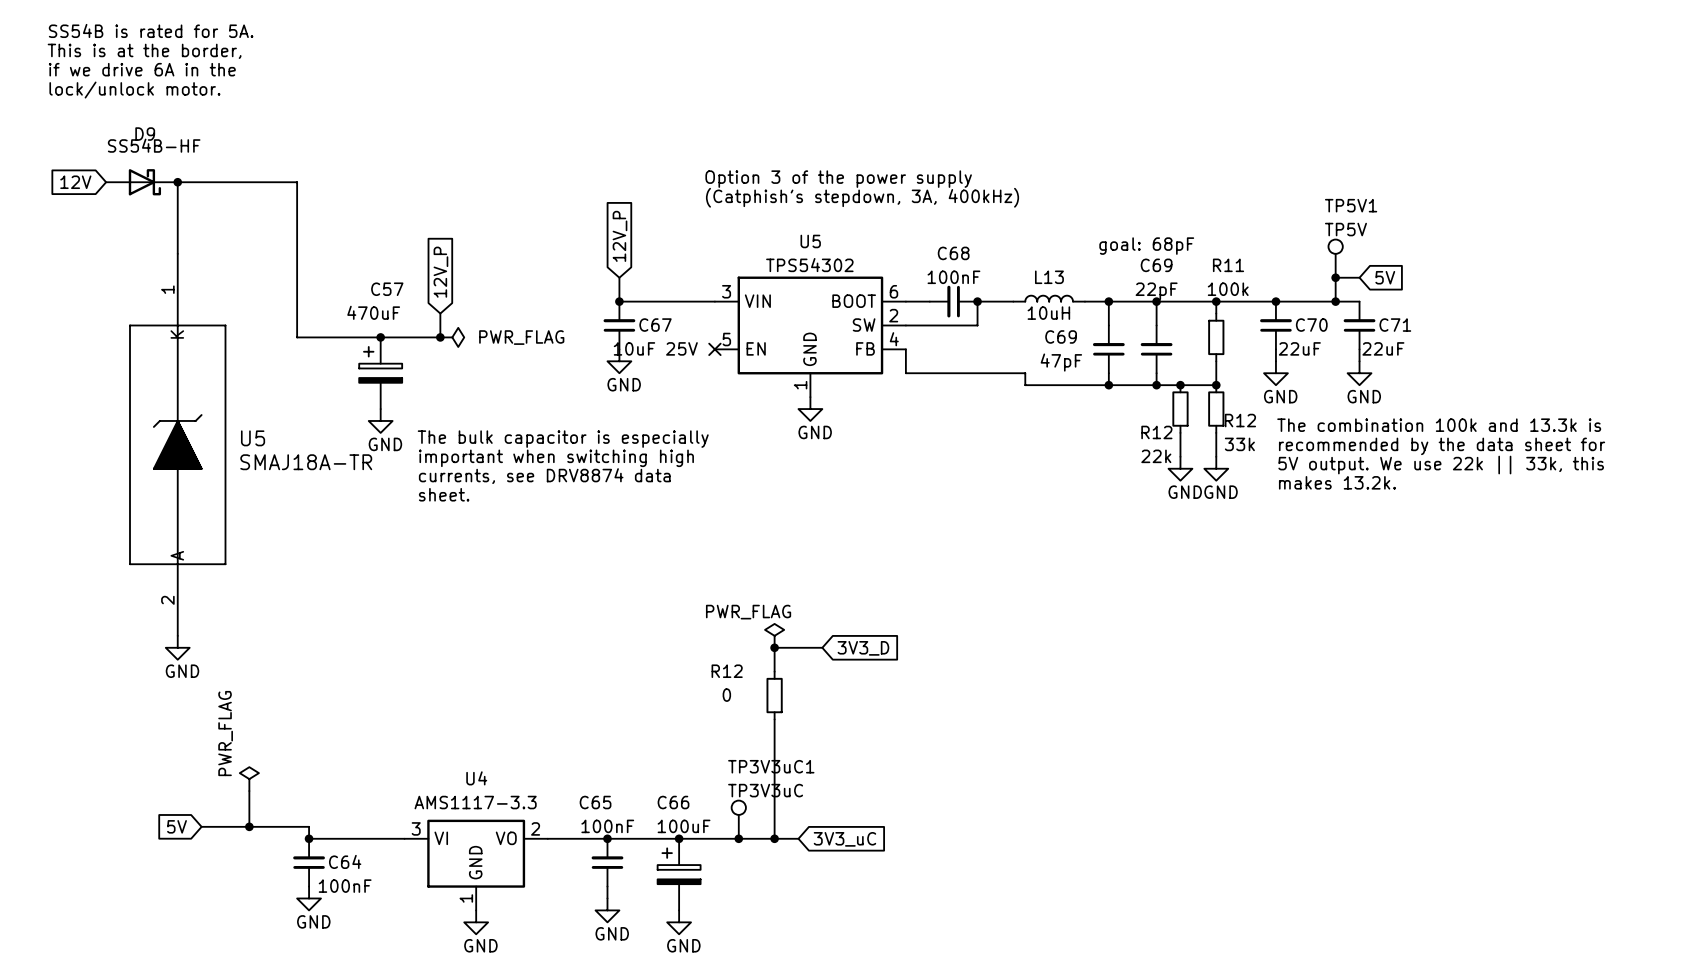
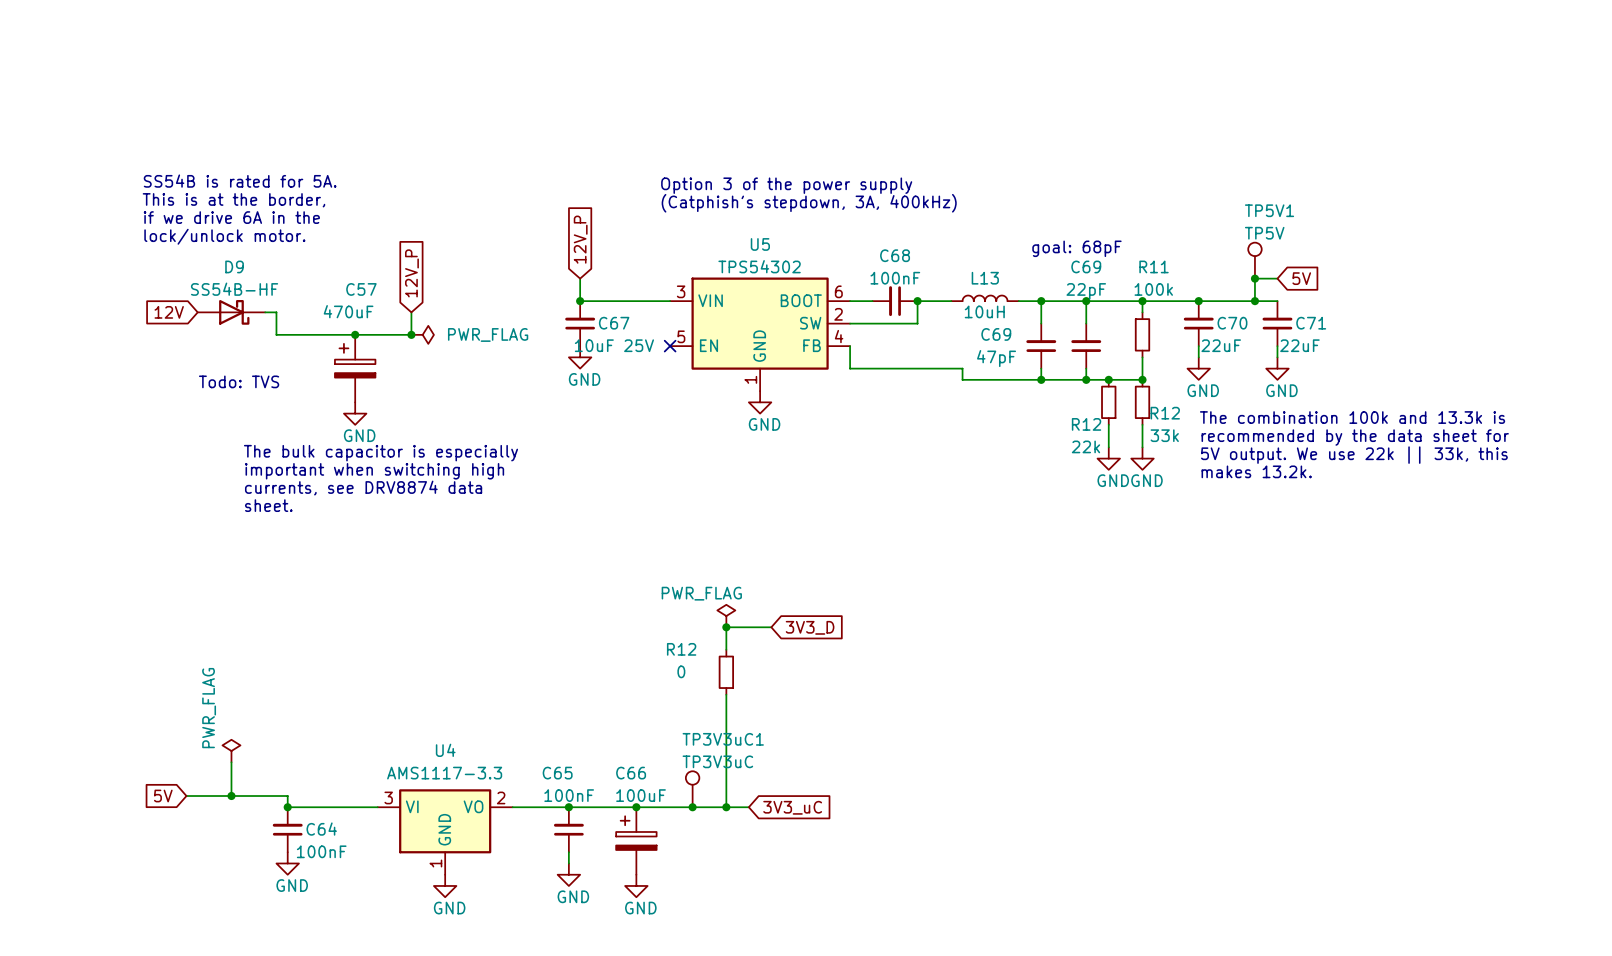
text position: SS54B is rated for 5A. (151, 30) -> SS54B is rated for 5A. (240, 181)
text position: This is at the border, (144, 51) -> This is at the border, (233, 200)
text position: if we drive 6A in the (142, 69) -> if we drive 6A in the (231, 217)
text position: lock/unlock motor. (134, 90) -> lock/unlock motor. (224, 236)
D9 value position: SS54B-HF (154, 145) -> SS54B-HF (234, 289)
global label position: 12V (75, 182) -> 12V (169, 312)
D9 position: (141, 182) -> (231, 312)
junction: (177, 182) -> none
wire: (177, 253) (177, 182) (297, 182) (297, 313) -> (265, 312) (276, 312)
text: none -> Todo: TVS (239, 381)
text position: The bulk capacitor is especially (563, 439) -> The bulk capacitor is especially (380, 453)
U5: SMAJ18A-TR (177, 444) -> none
text position: important when switching high (556, 458) -> important when switching high (374, 471)
text position: currents, see DRV8874 data (544, 476) -> currents, see DRV8874 data (363, 488)
text position: sheet. (444, 494) -> sheet. (268, 505)
power symbol: GND (177, 647) -> none

